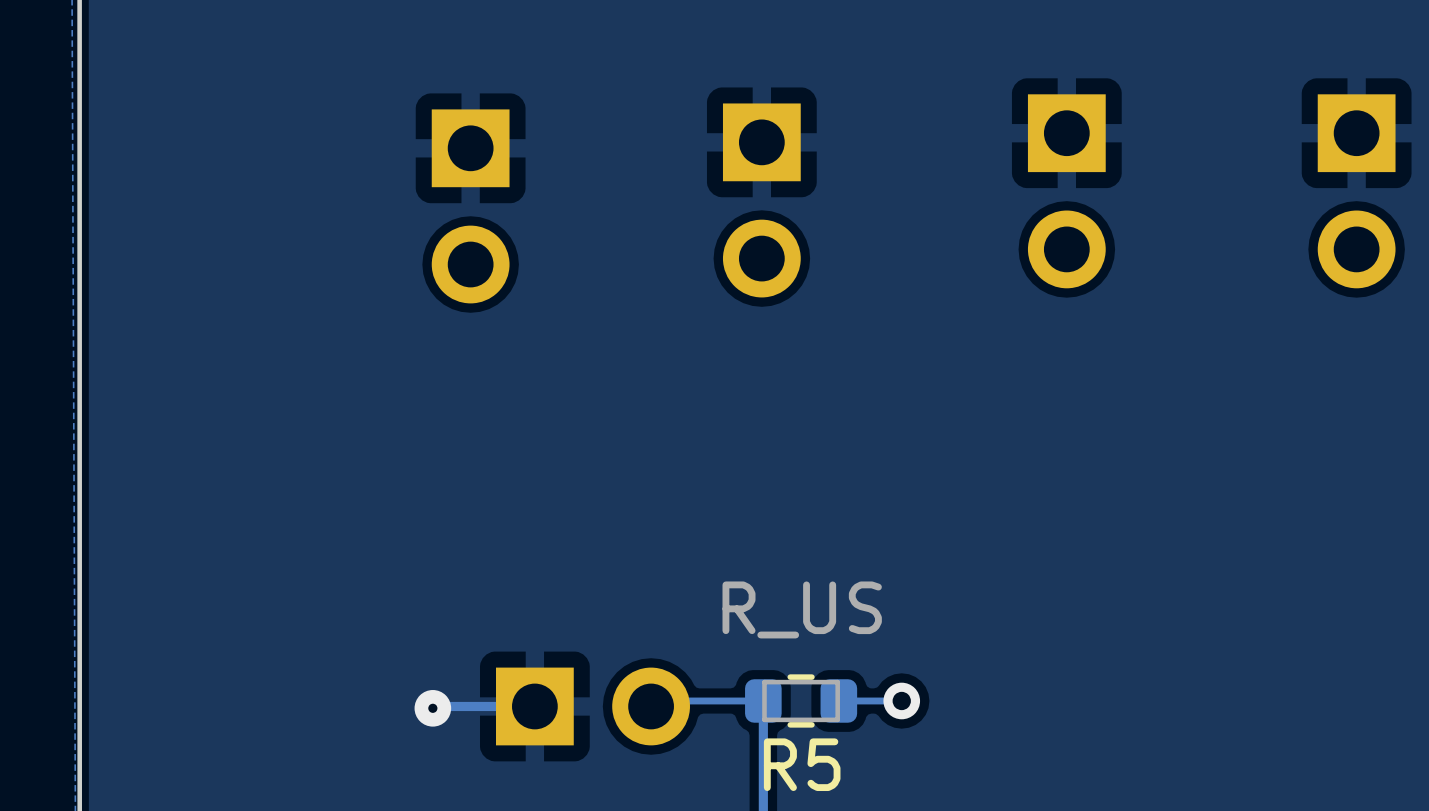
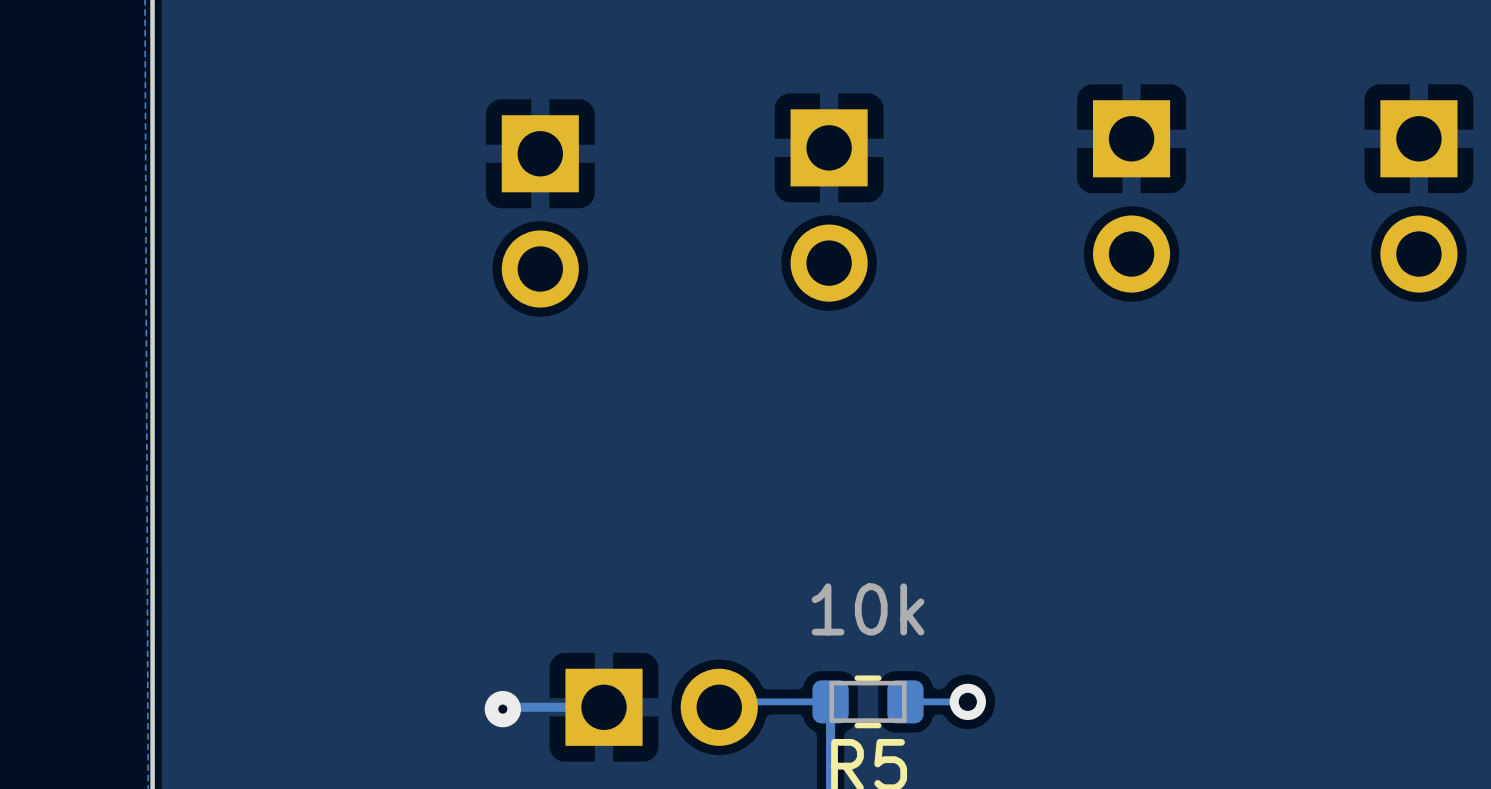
R5 value: R_US (802, 609) -> 10k (868, 609)

